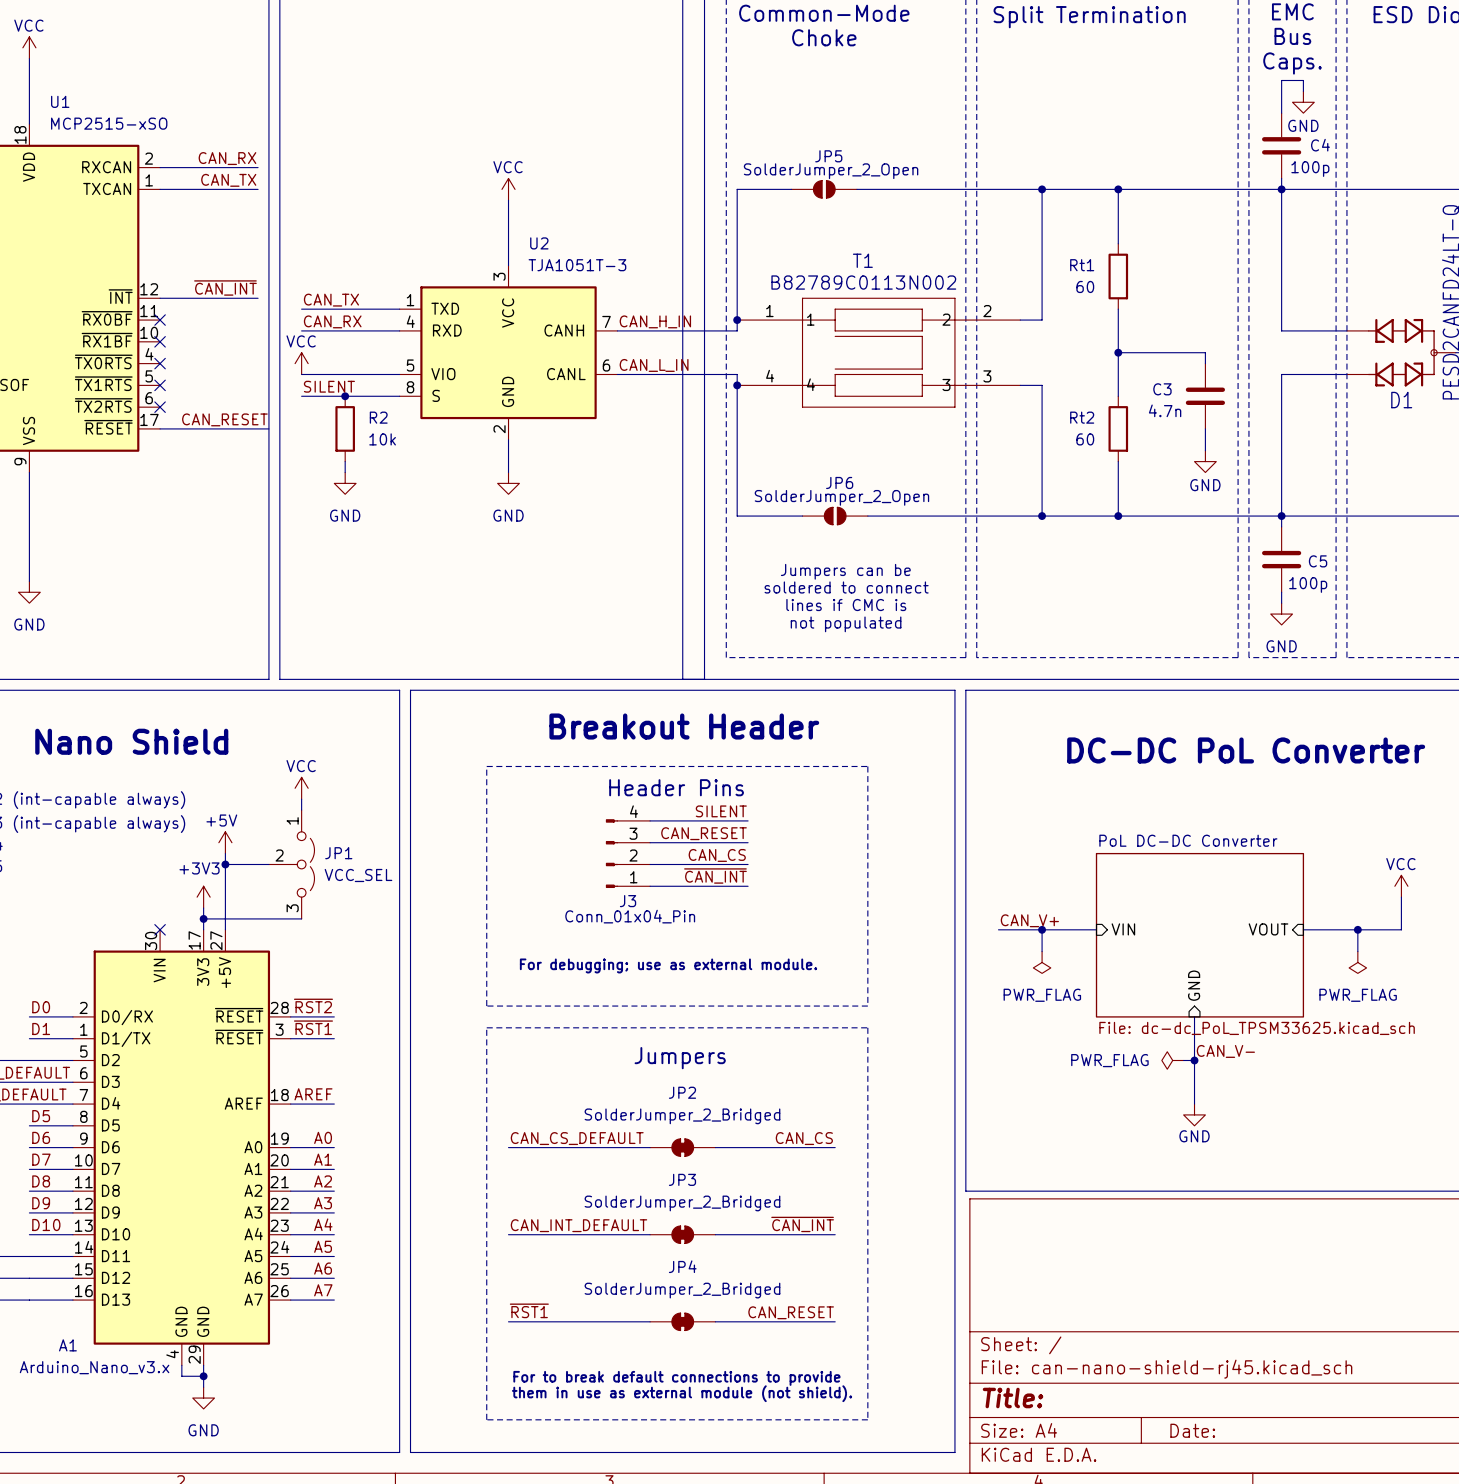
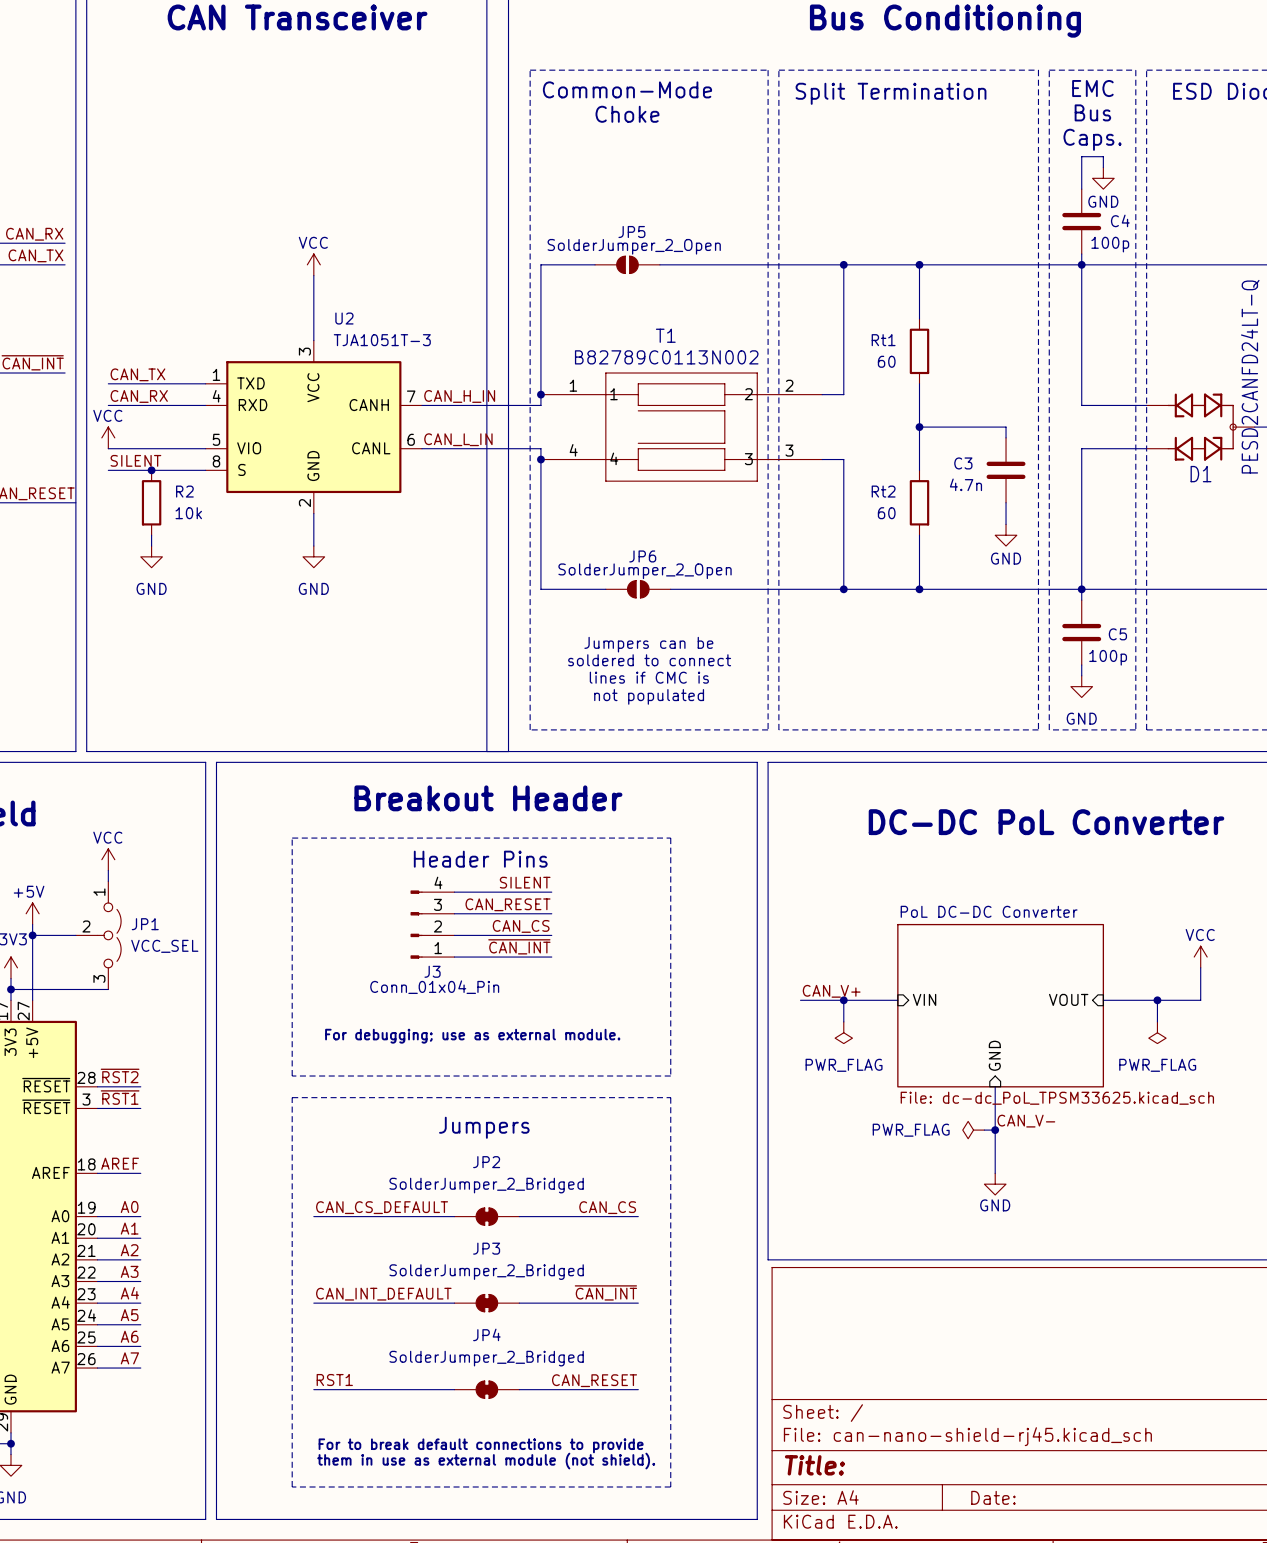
label: ~{RST1} (529, 1310) -> RST1 (334, 1380)

